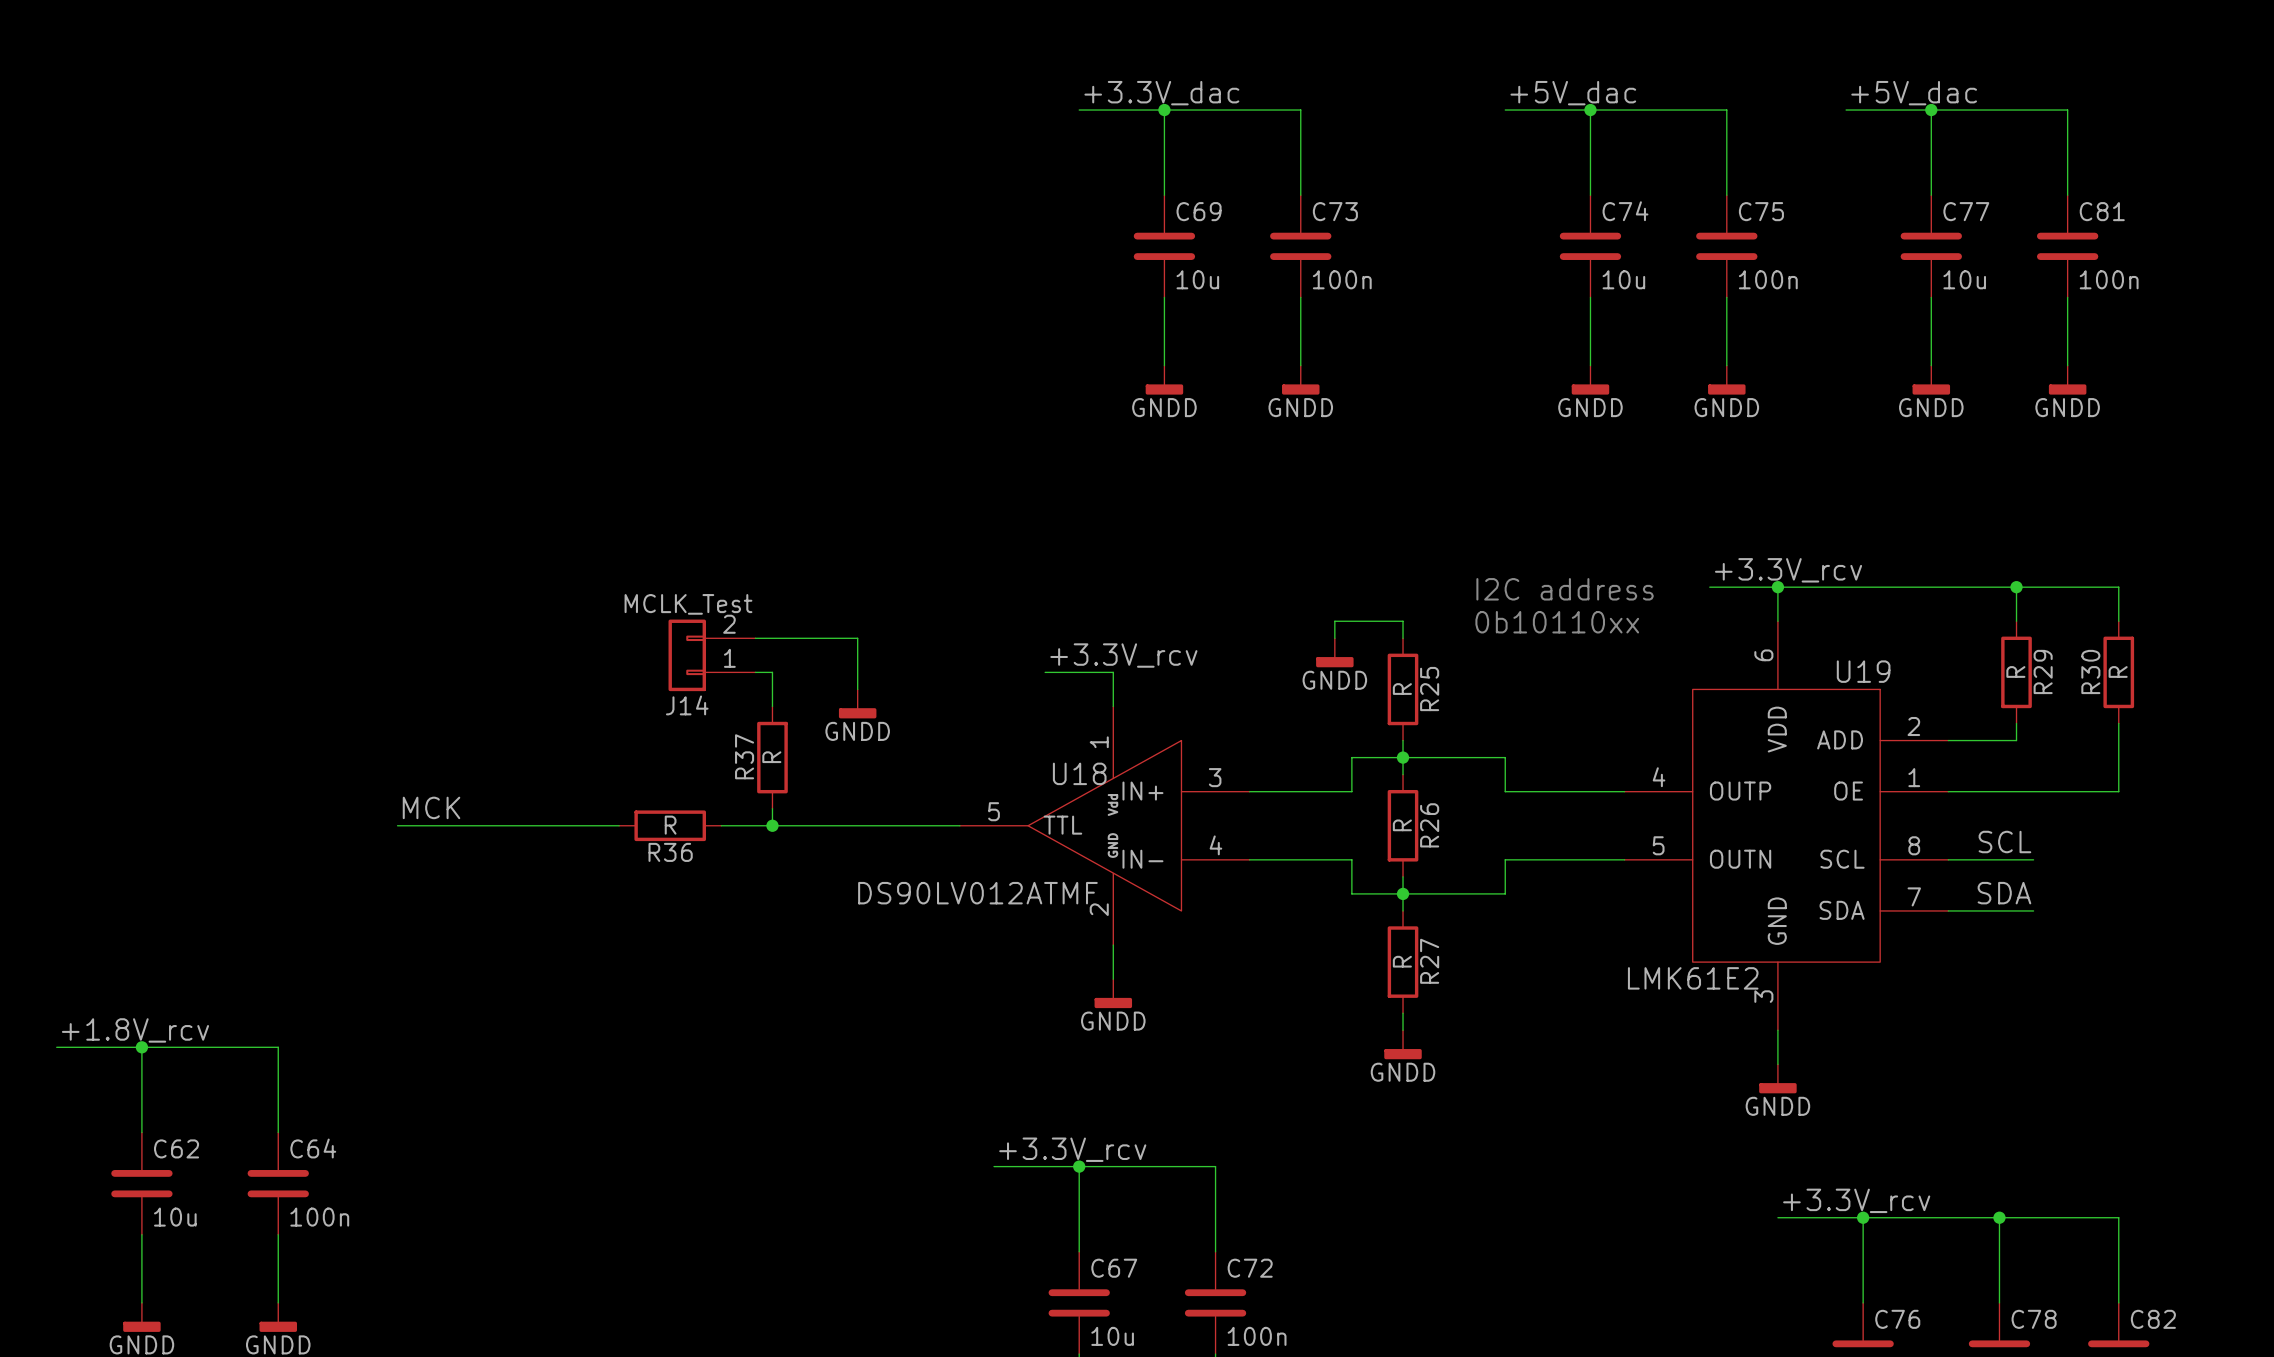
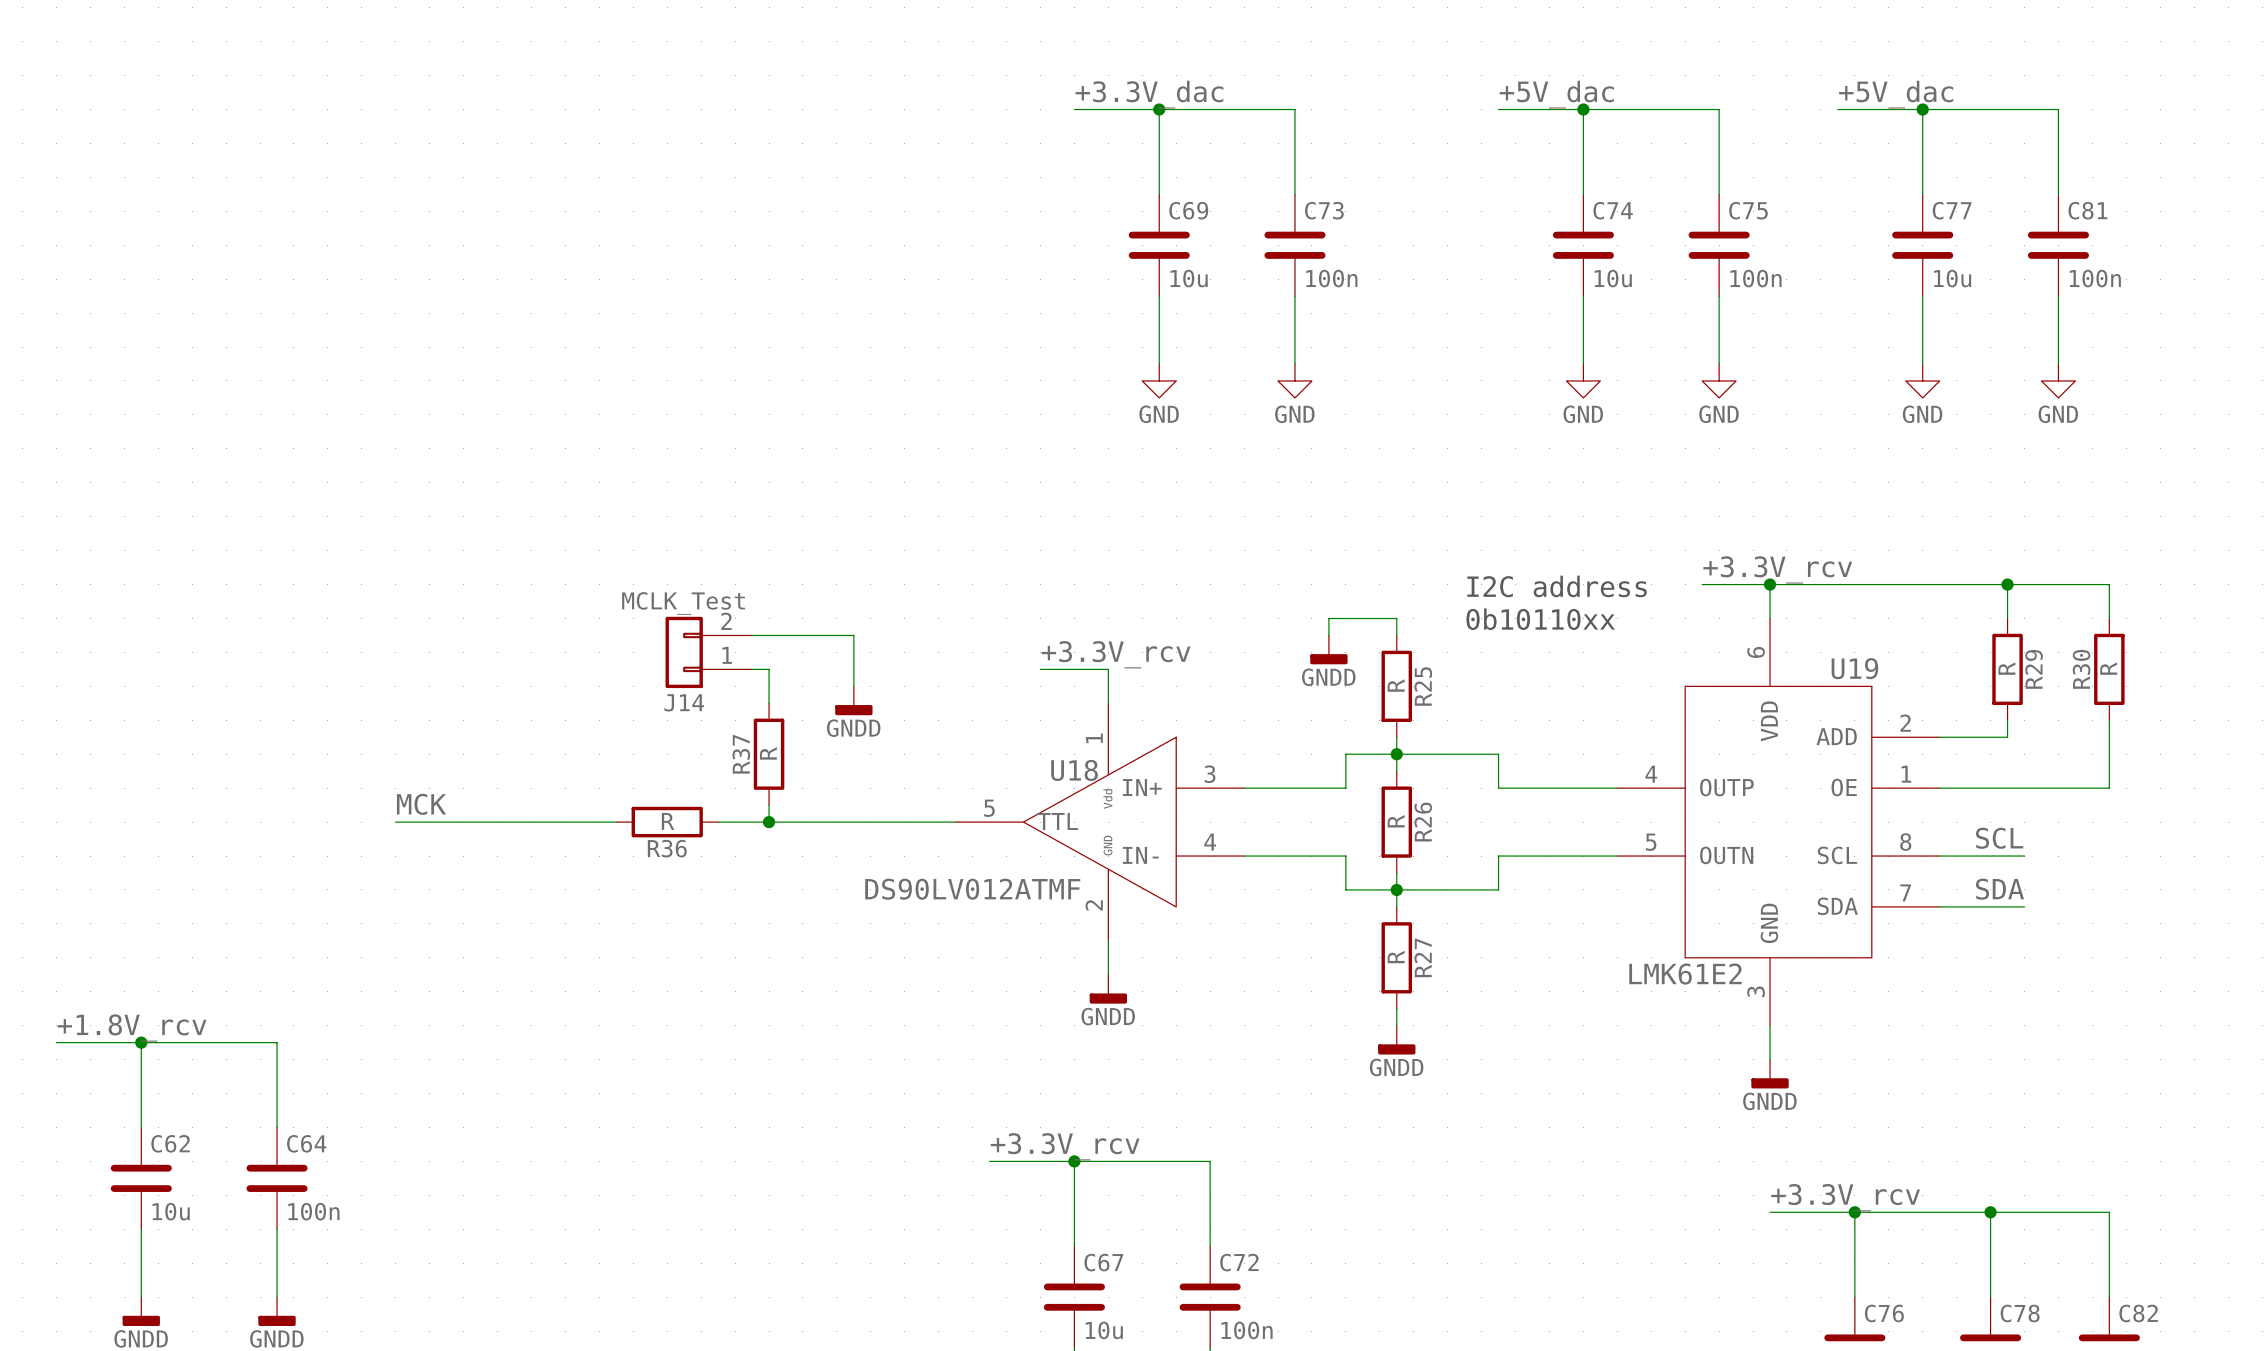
power symbol: GNDD (1164, 380) -> GND (1159, 380)
power symbol: GNDD (1300, 380) -> GND (1294, 380)
power symbol: GNDD (1590, 380) -> GND (1583, 380)
power symbol: GNDD (1726, 380) -> GND (1719, 380)
power symbol: GNDD (1931, 380) -> GND (1922, 380)
power symbol: GNDD (2067, 380) -> GND (2058, 380)

